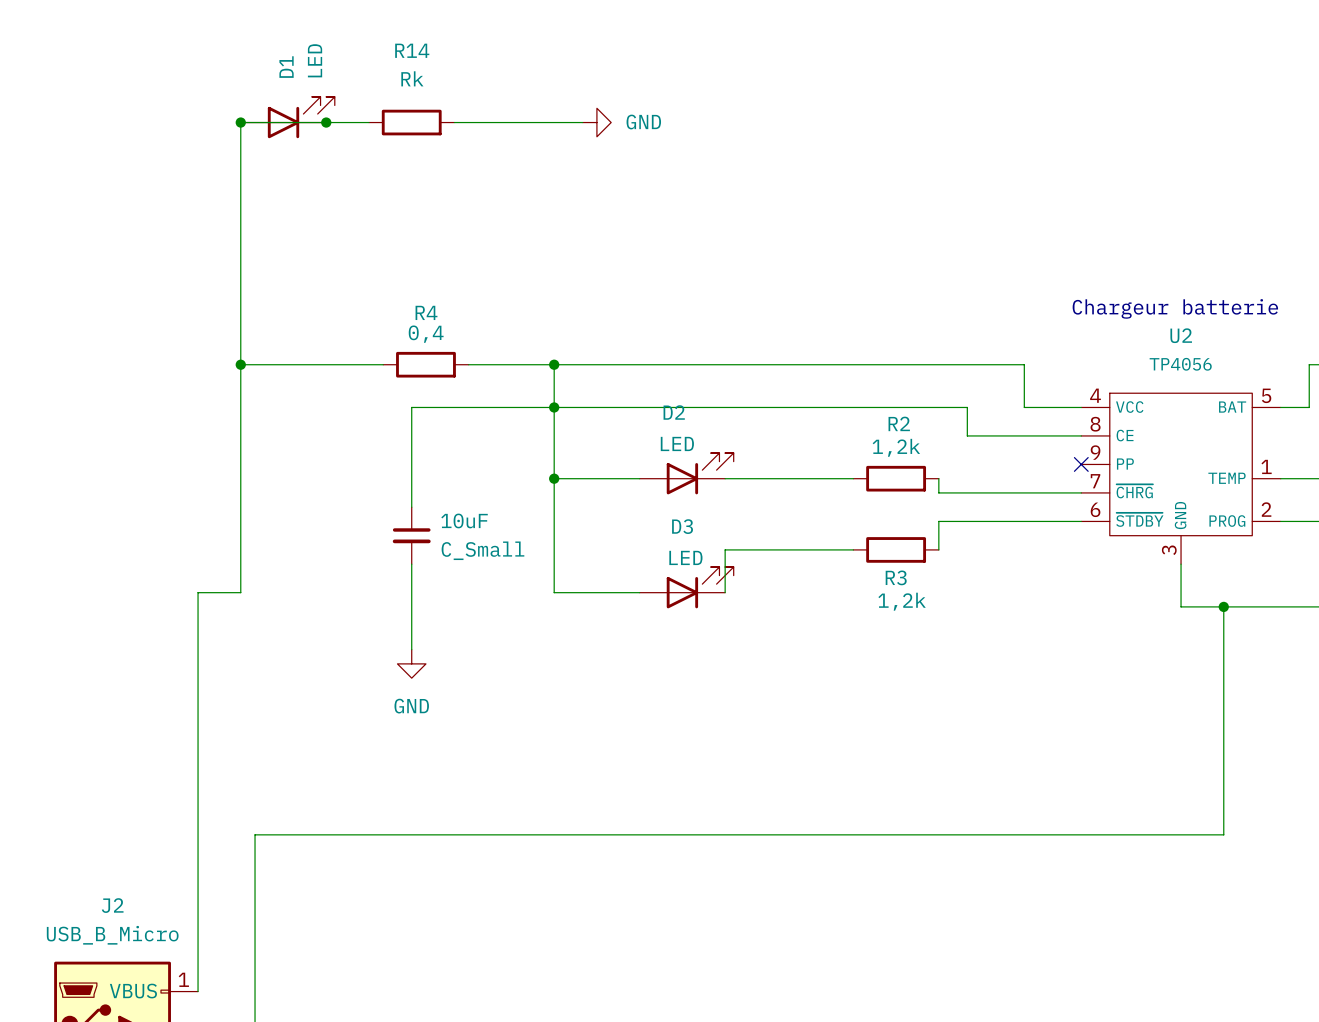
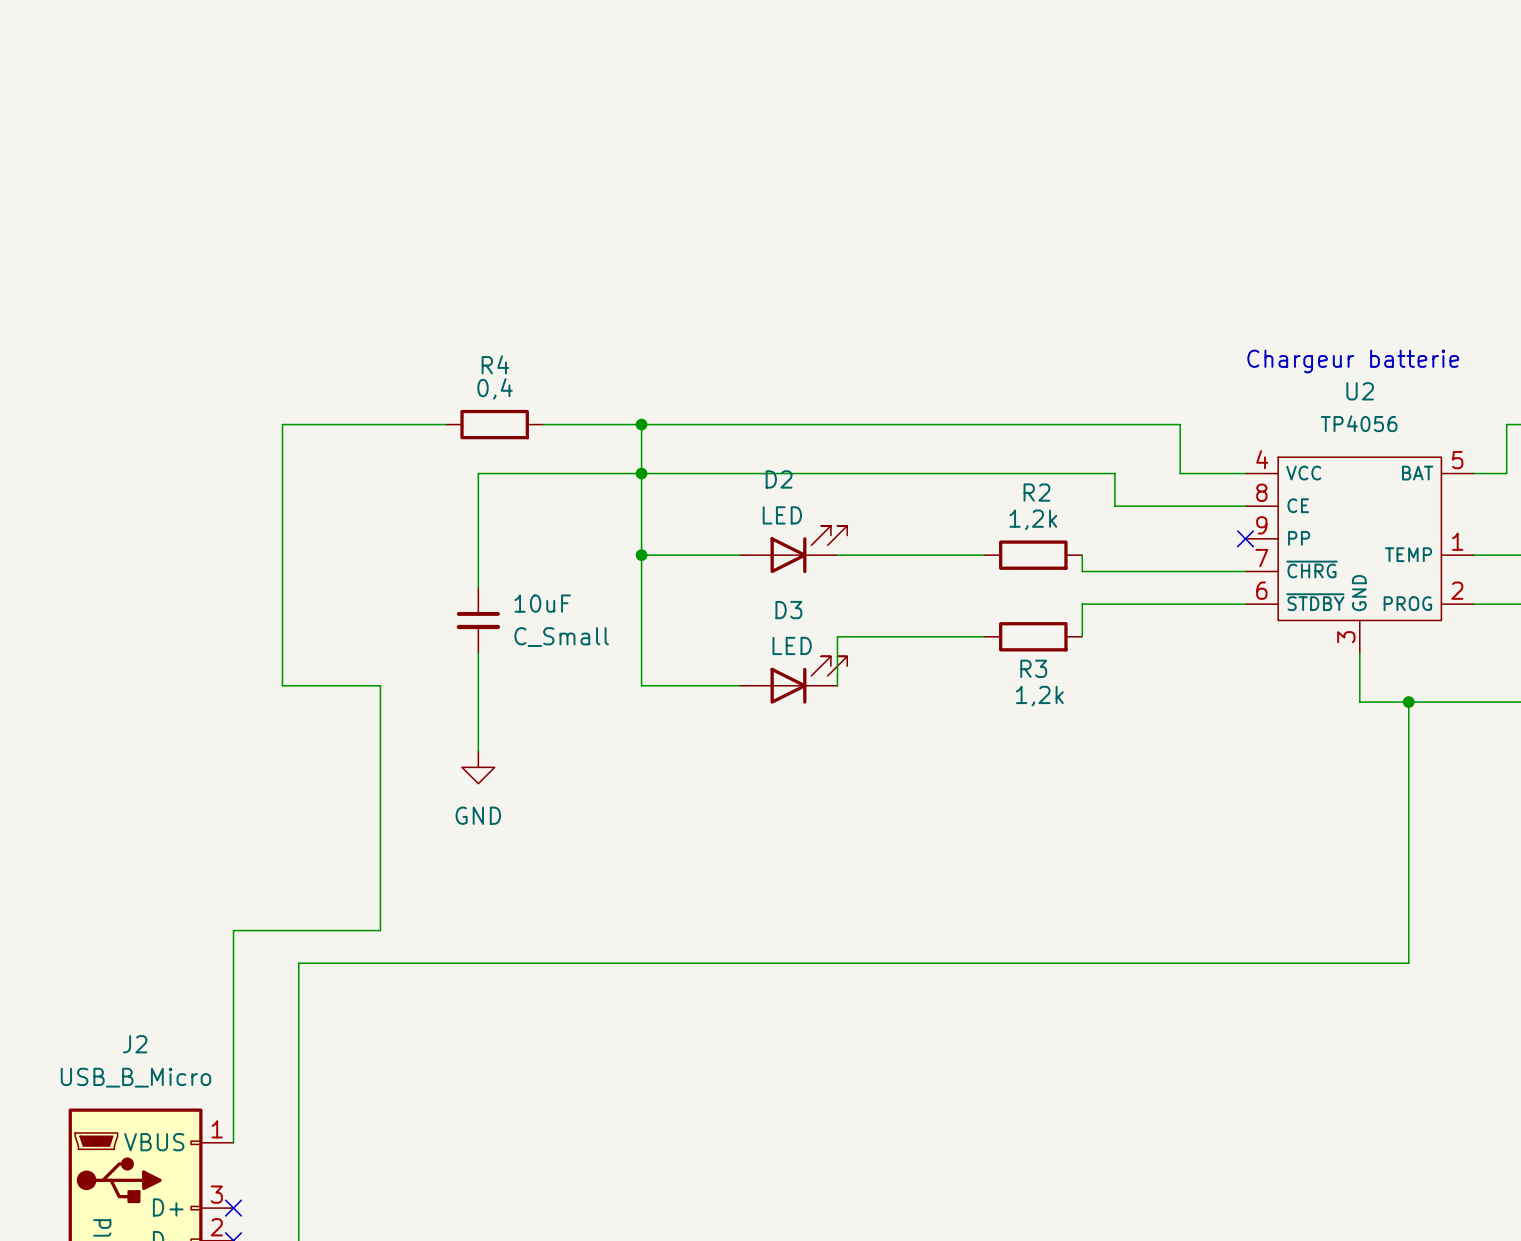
D1: LED (287, 117) -> none
junction: (240, 122) -> none
junction: (326, 122) -> none
wire: (368, 122) (240, 122) (240, 364) -> none
R14: Rk (411, 122) -> none
wire: (454, 122) (582, 122) -> none
power symbol: GND (596, 122) -> none
junction: (240, 364) -> none
wire: (240, 592) (198, 592) (198, 806) -> (282, 685) (380, 685) (380, 930) (233, 930)

